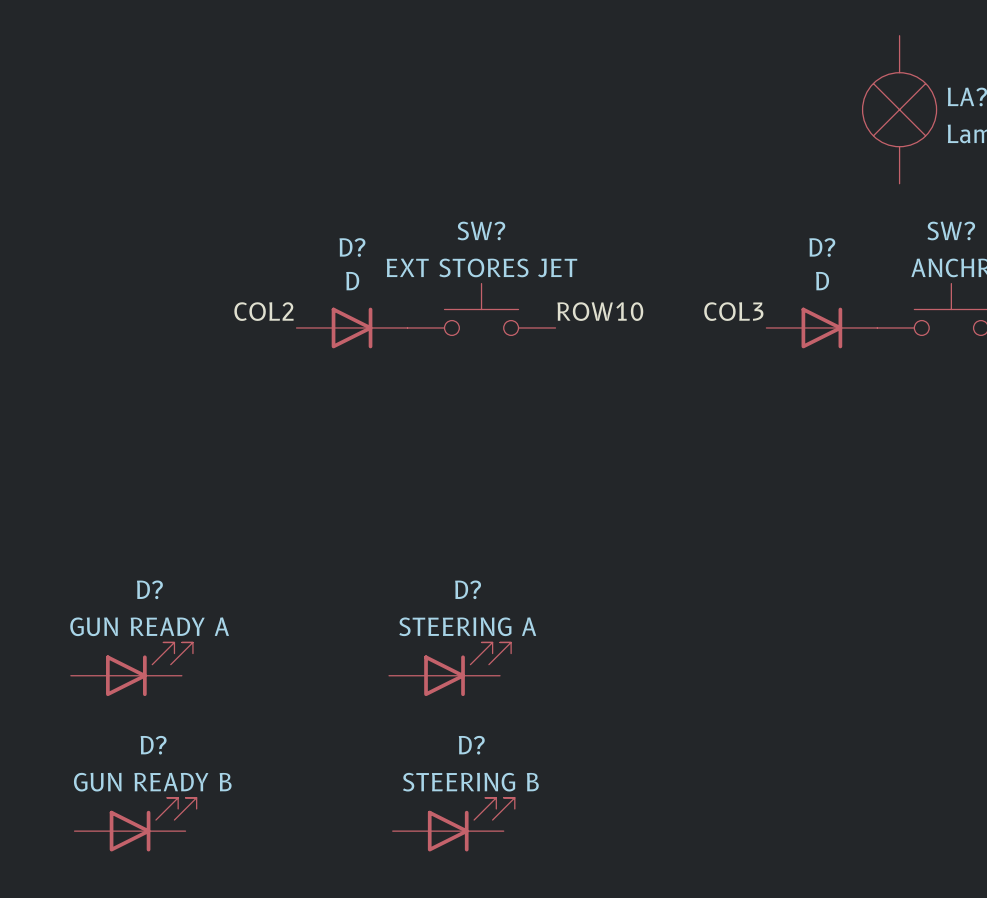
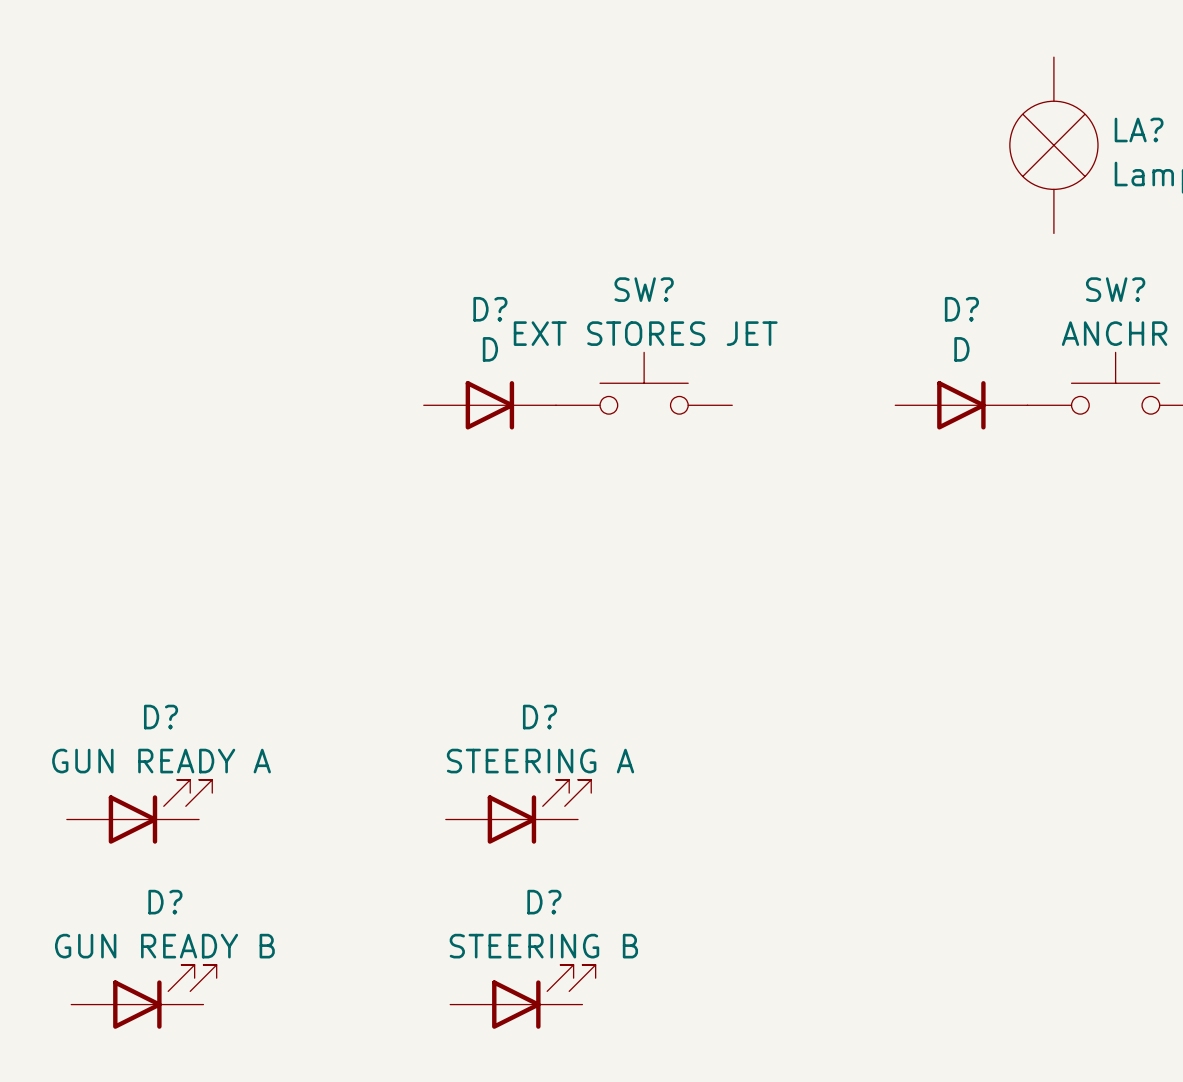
SW? position: (481, 309) -> (644, 383)
label: COL2 (263, 311) -> none
label: ROW10 (600, 311) -> none
label: COL3 (733, 311) -> none
D? position: (352, 327) -> (489, 405)

